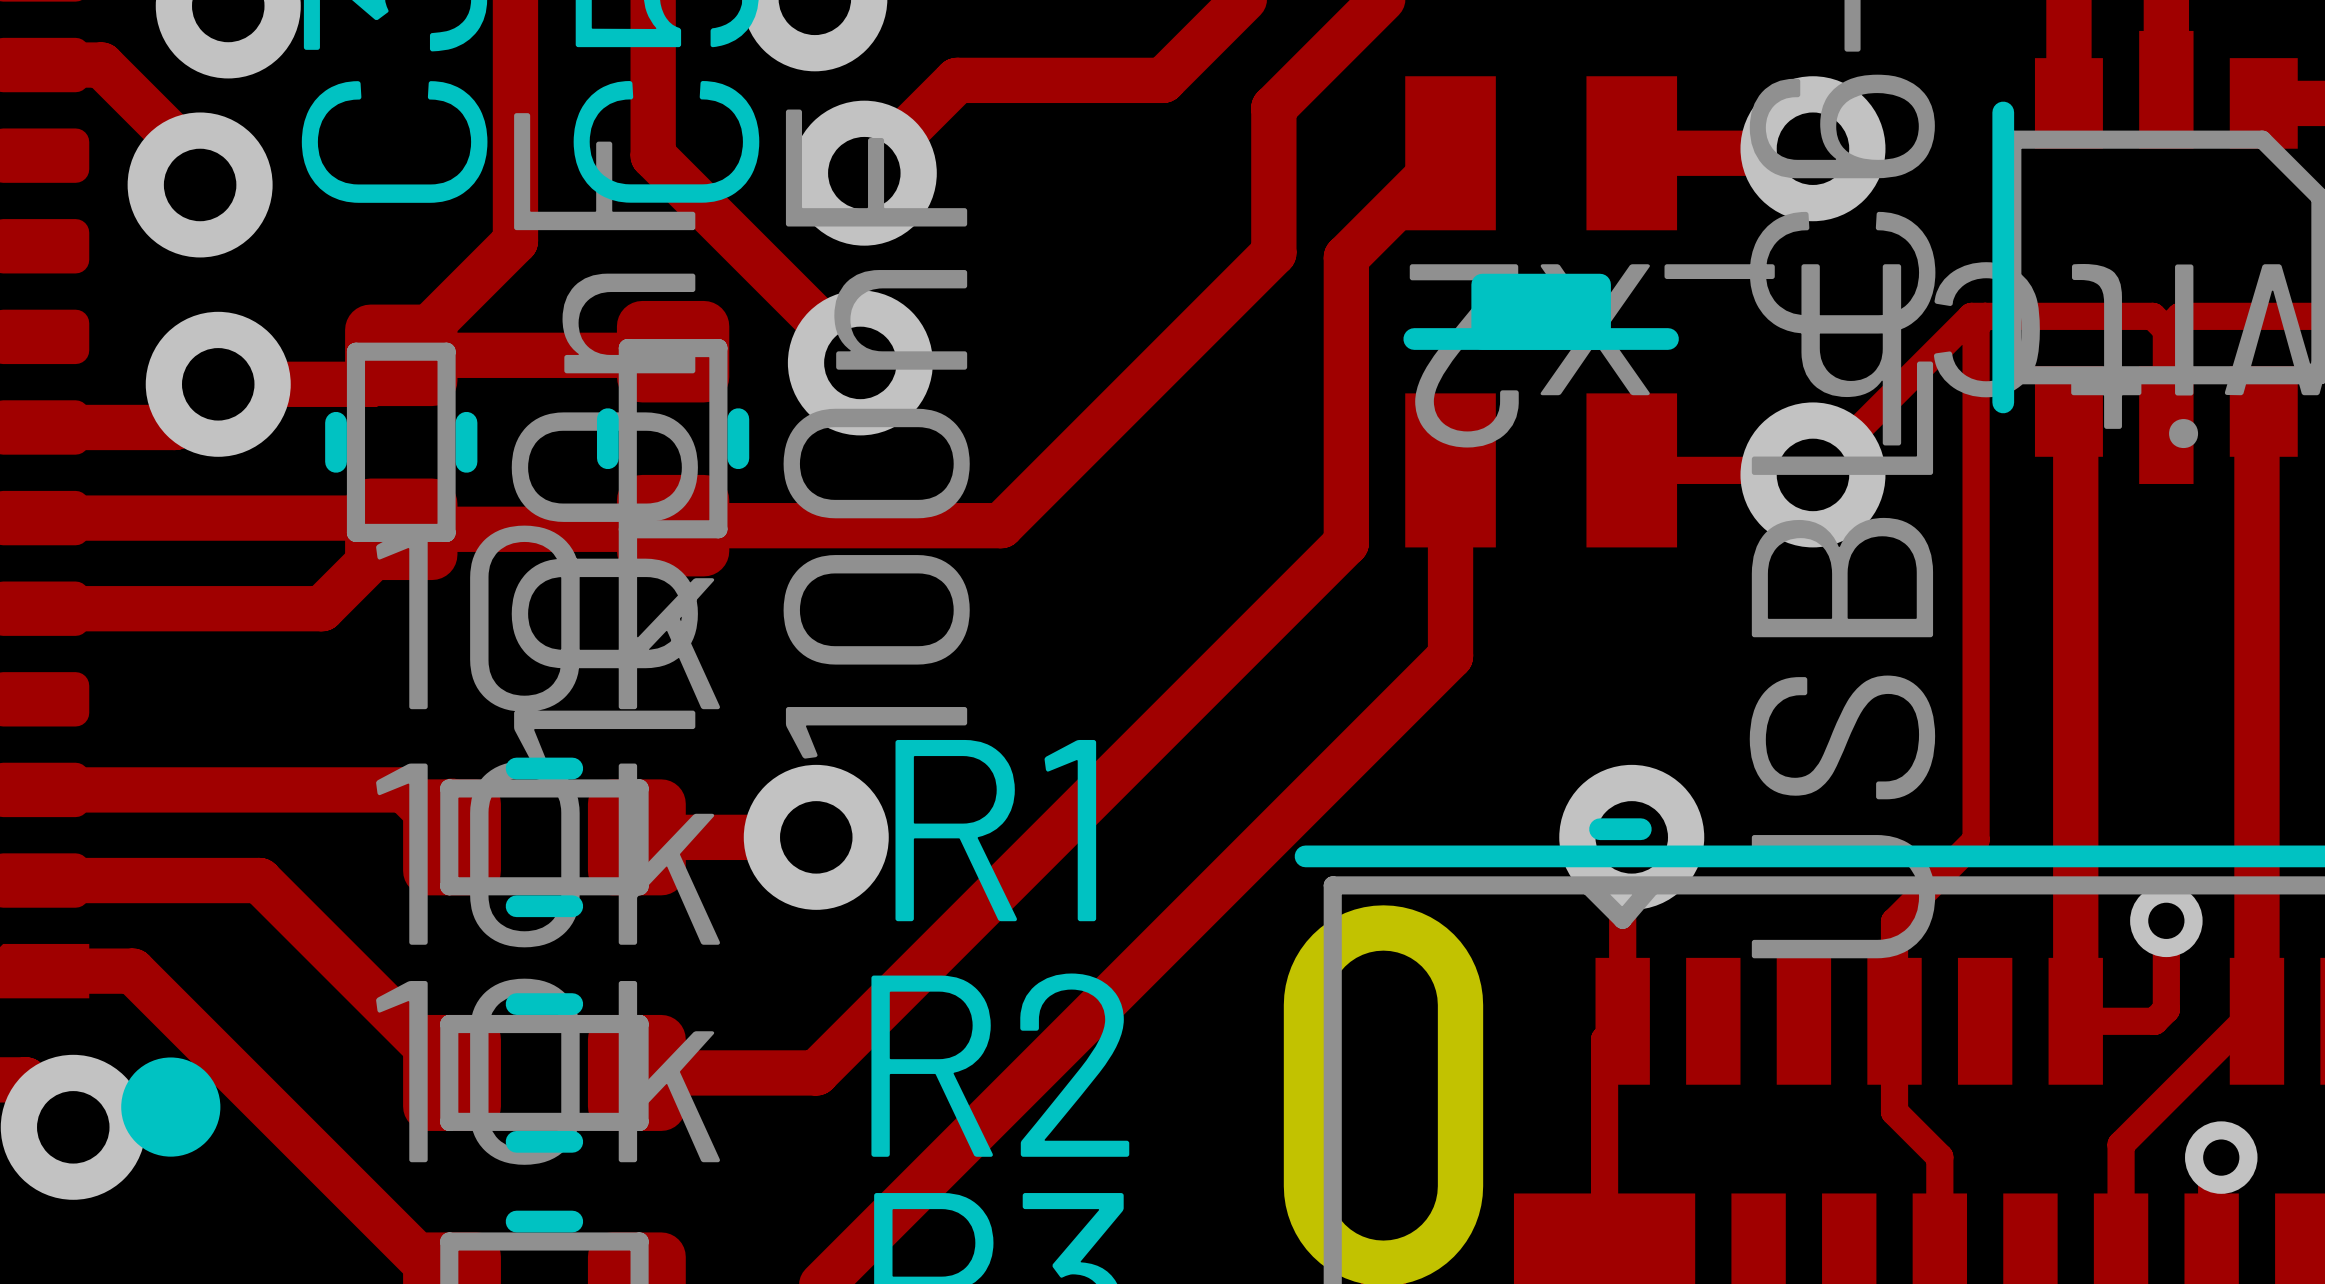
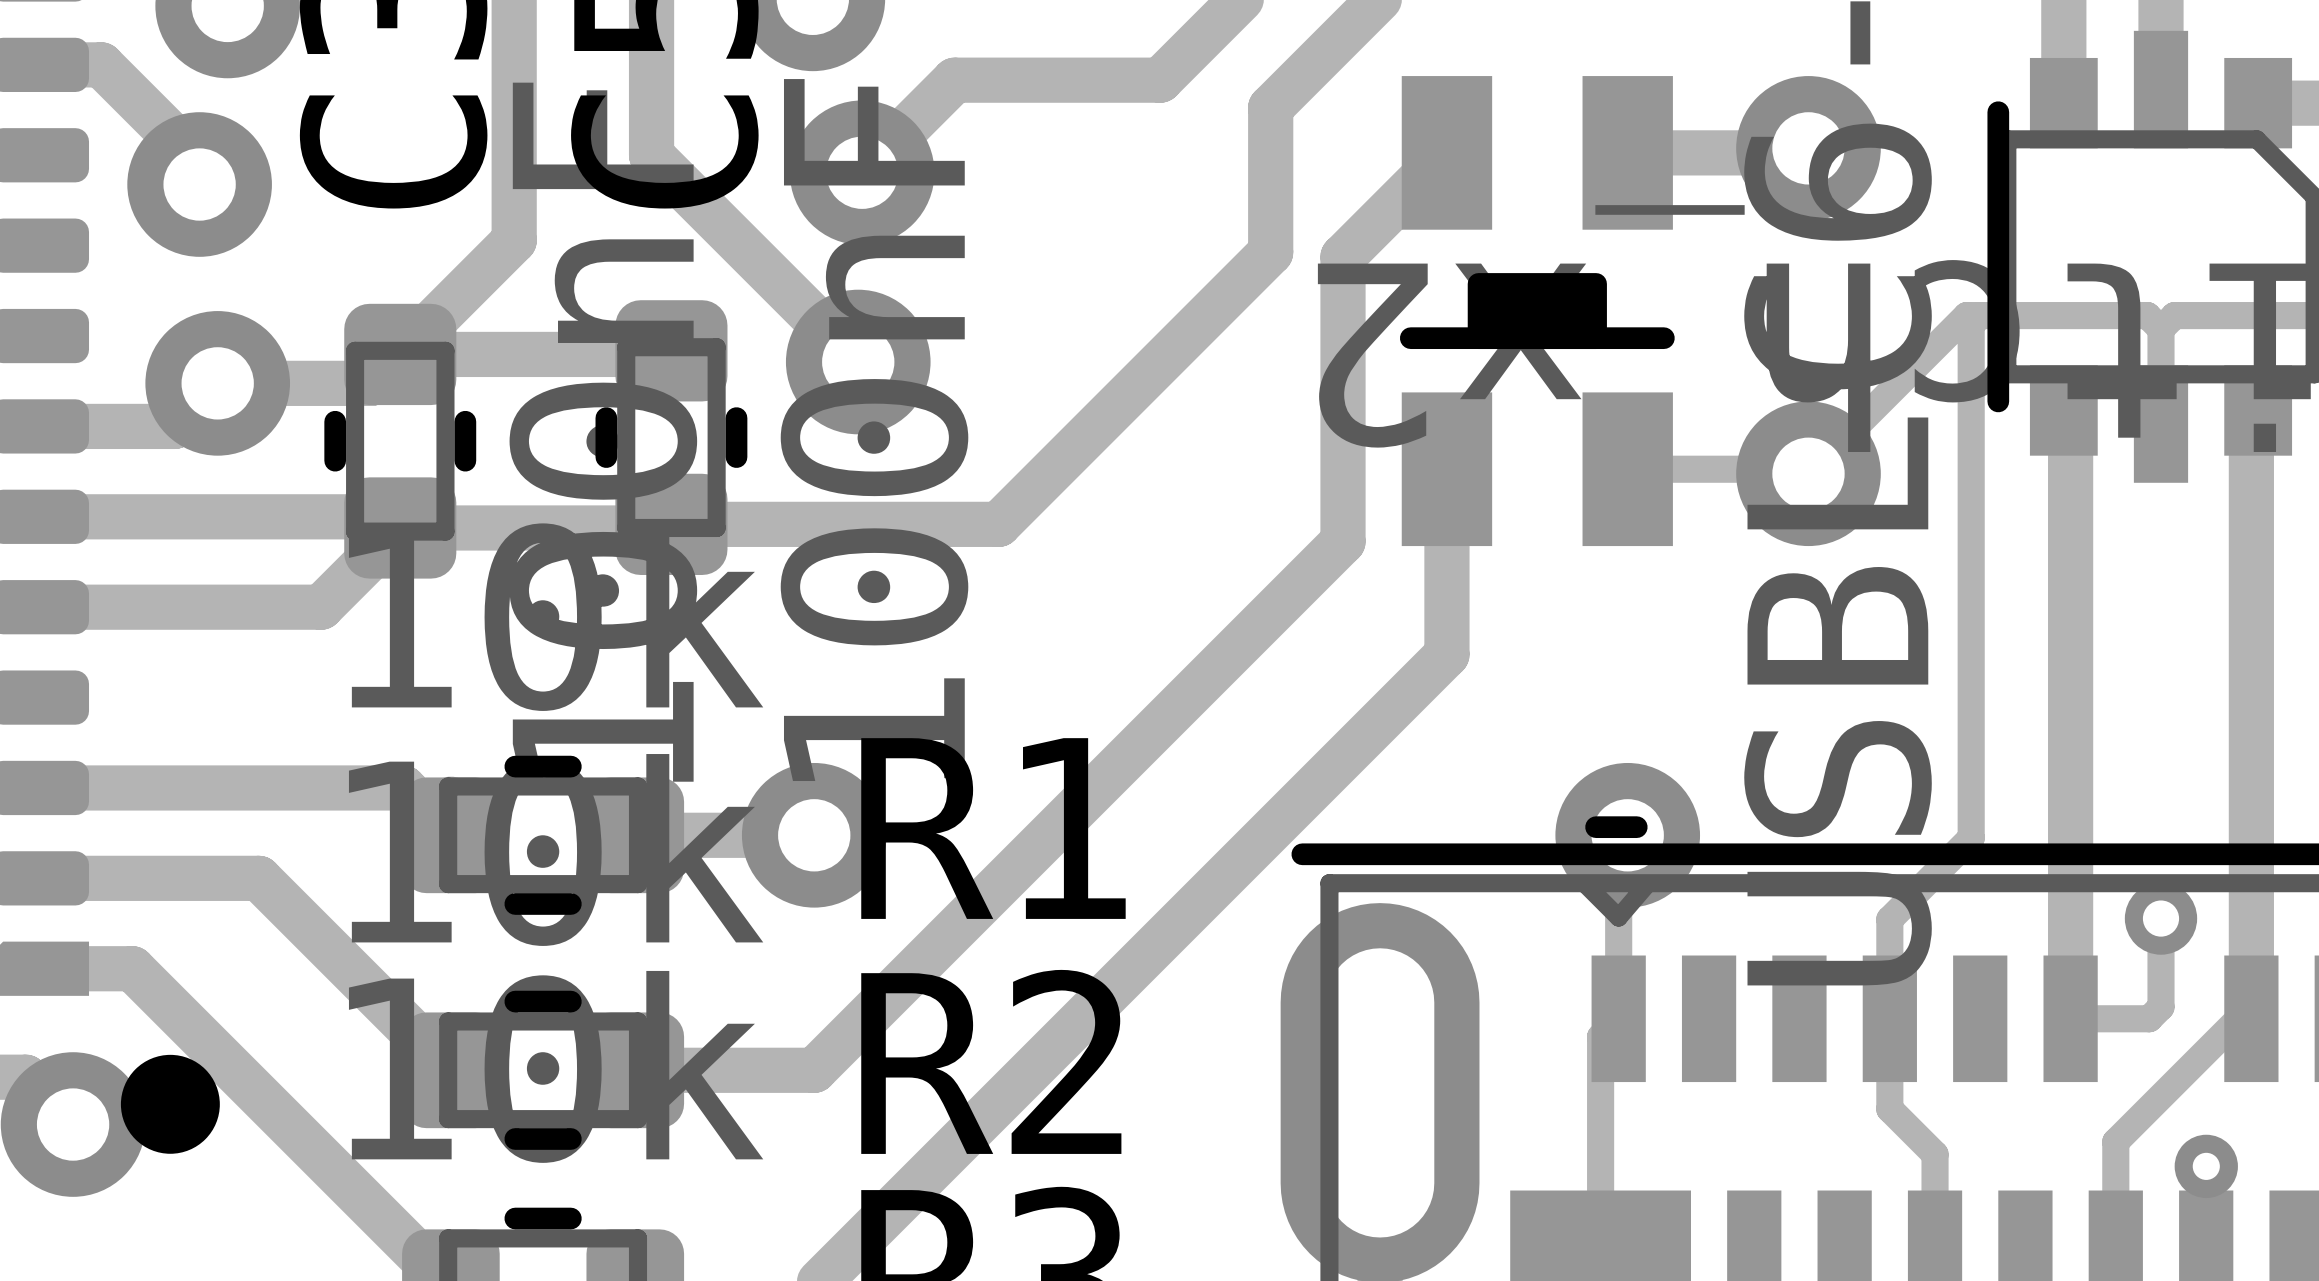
via size: [2185, 1121, 2258, 1194] -> [2174, 1134, 2238, 1199]

